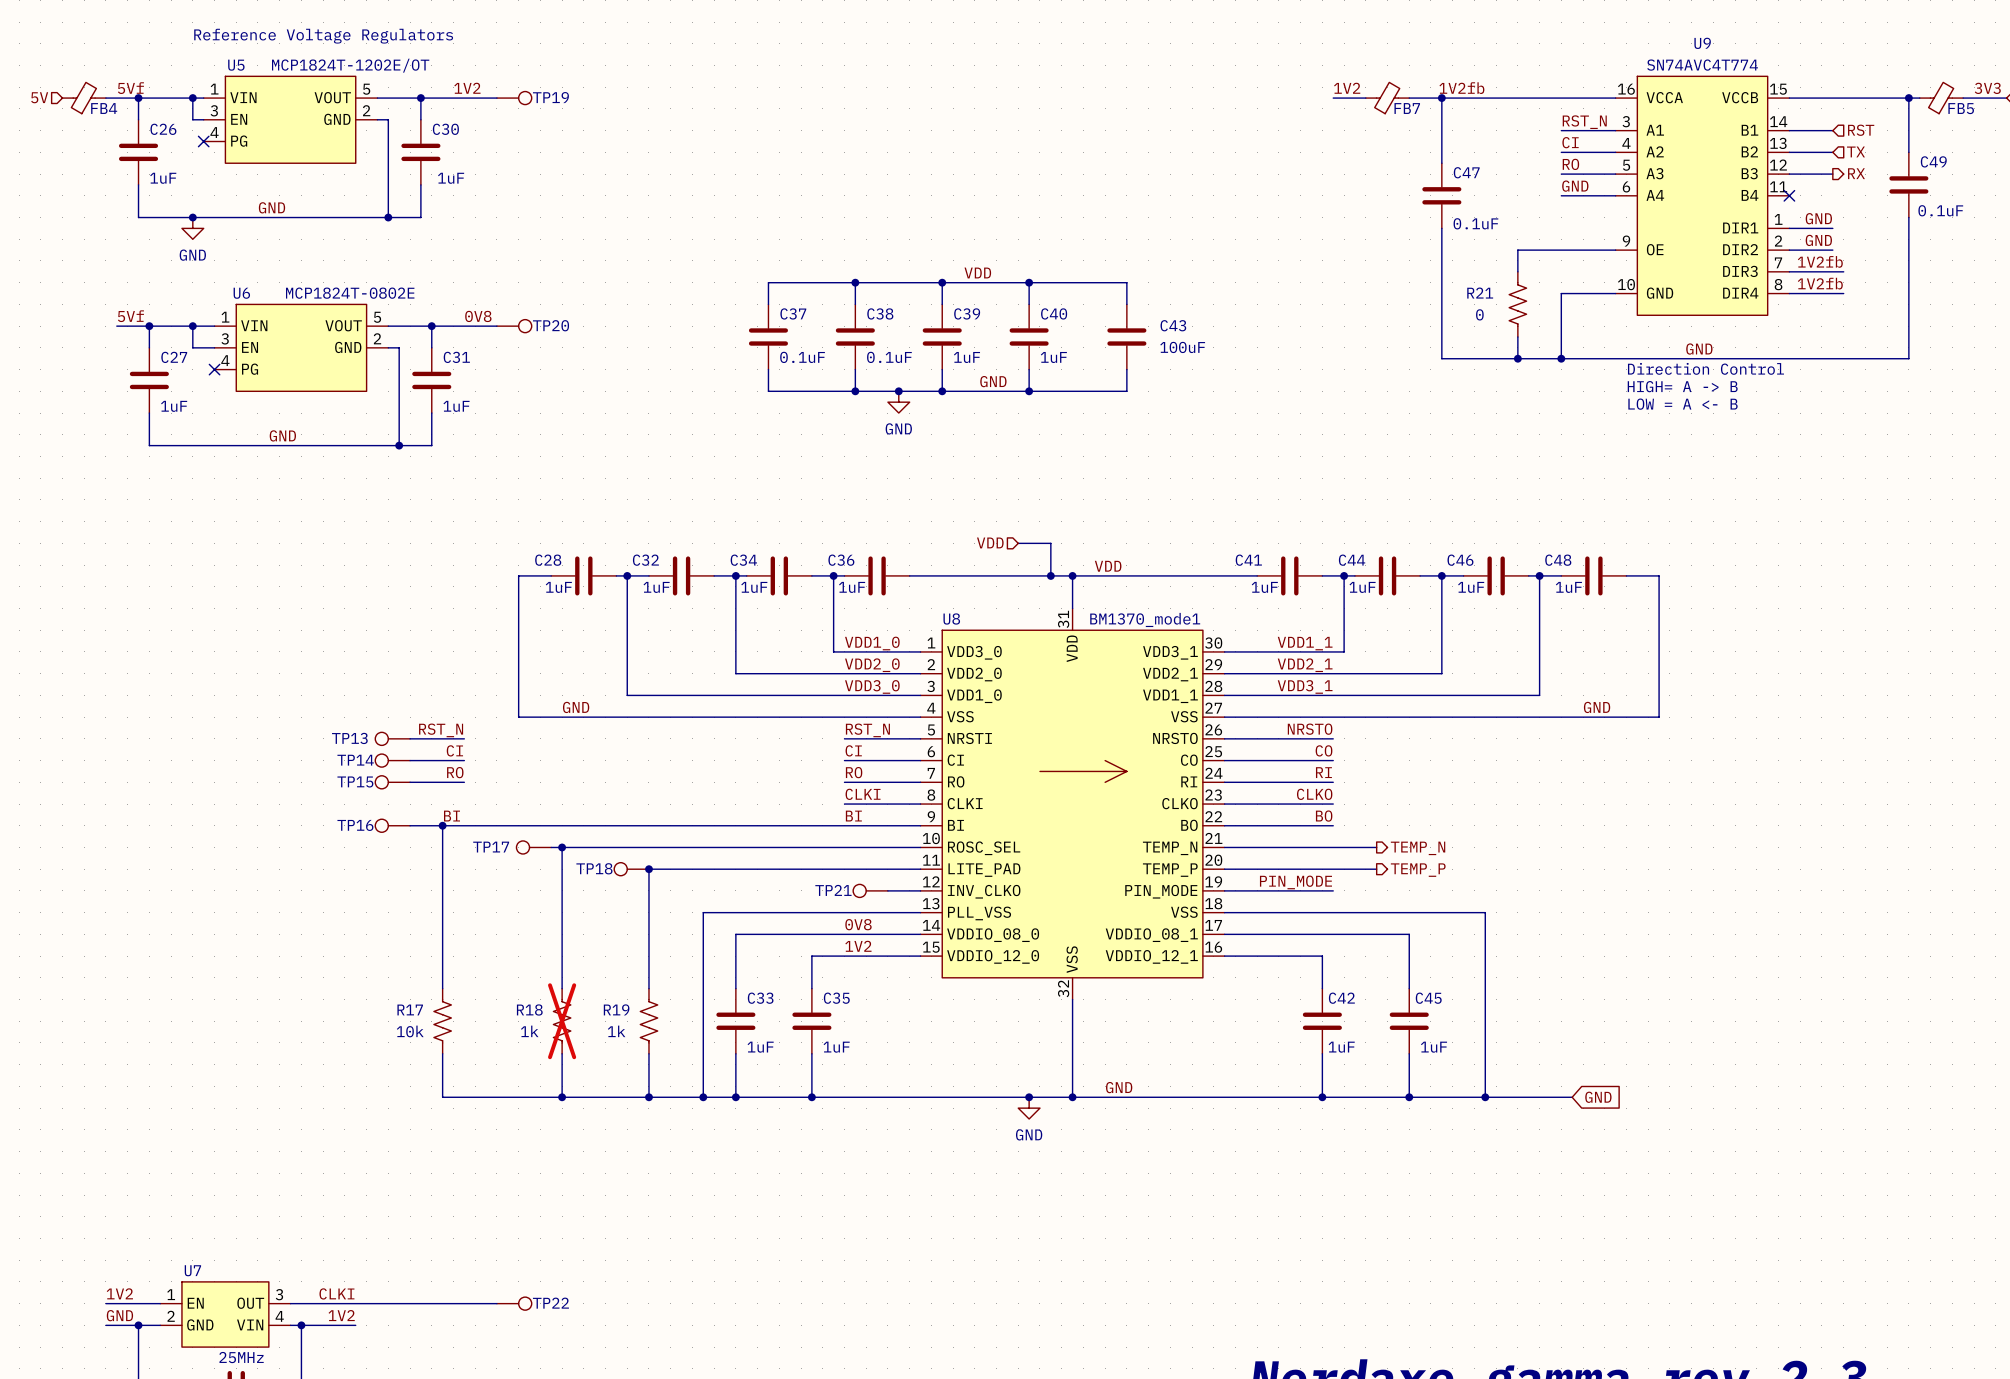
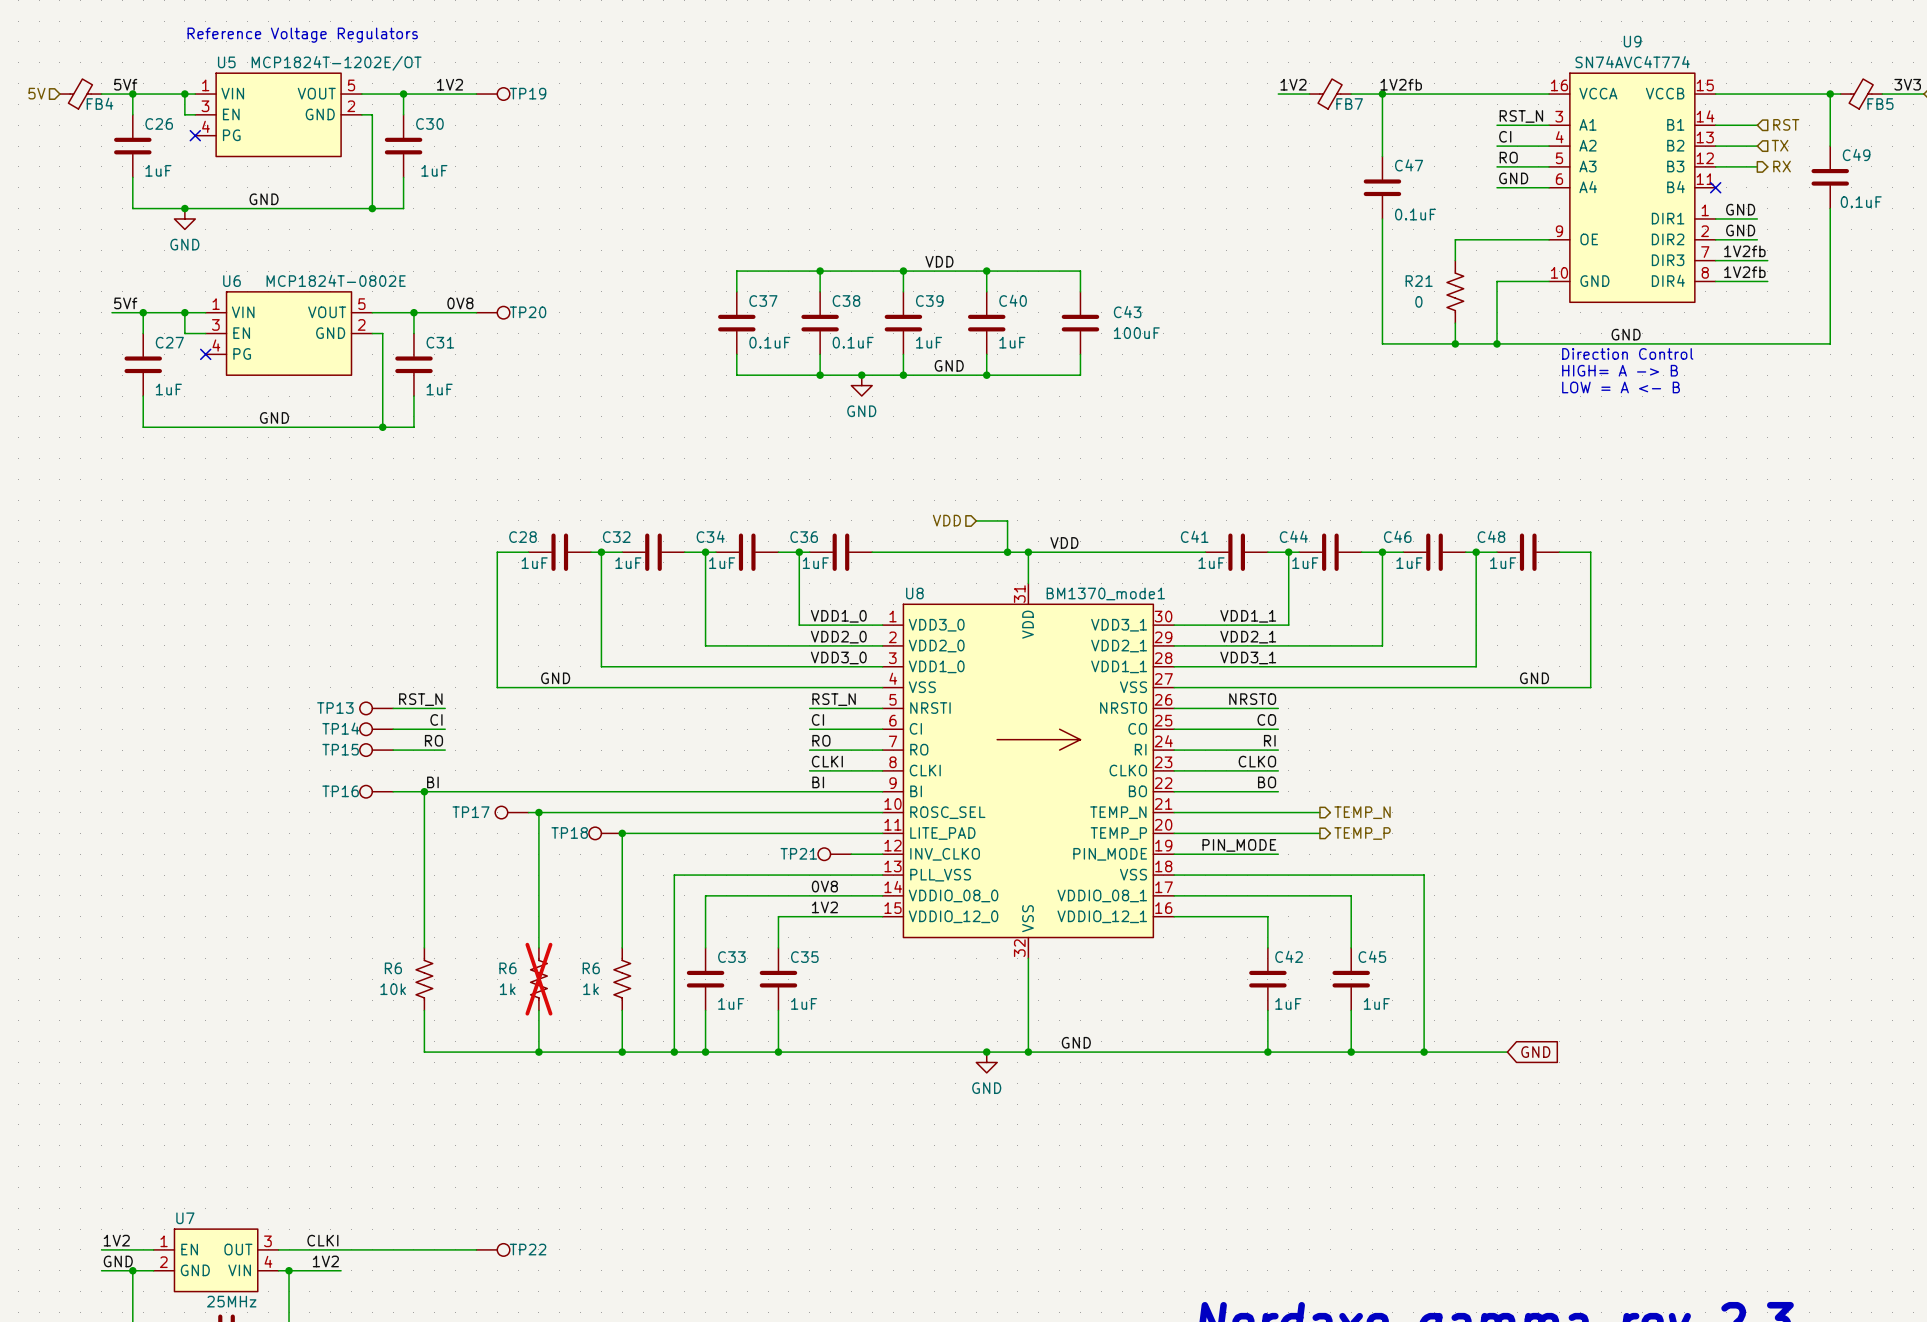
R17 name: R17 (410, 1009) -> R6 (393, 968)
R18 name: R18 (529, 1009) -> R6 (507, 968)
R19 name: R19 (616, 1009) -> R6 (591, 968)

